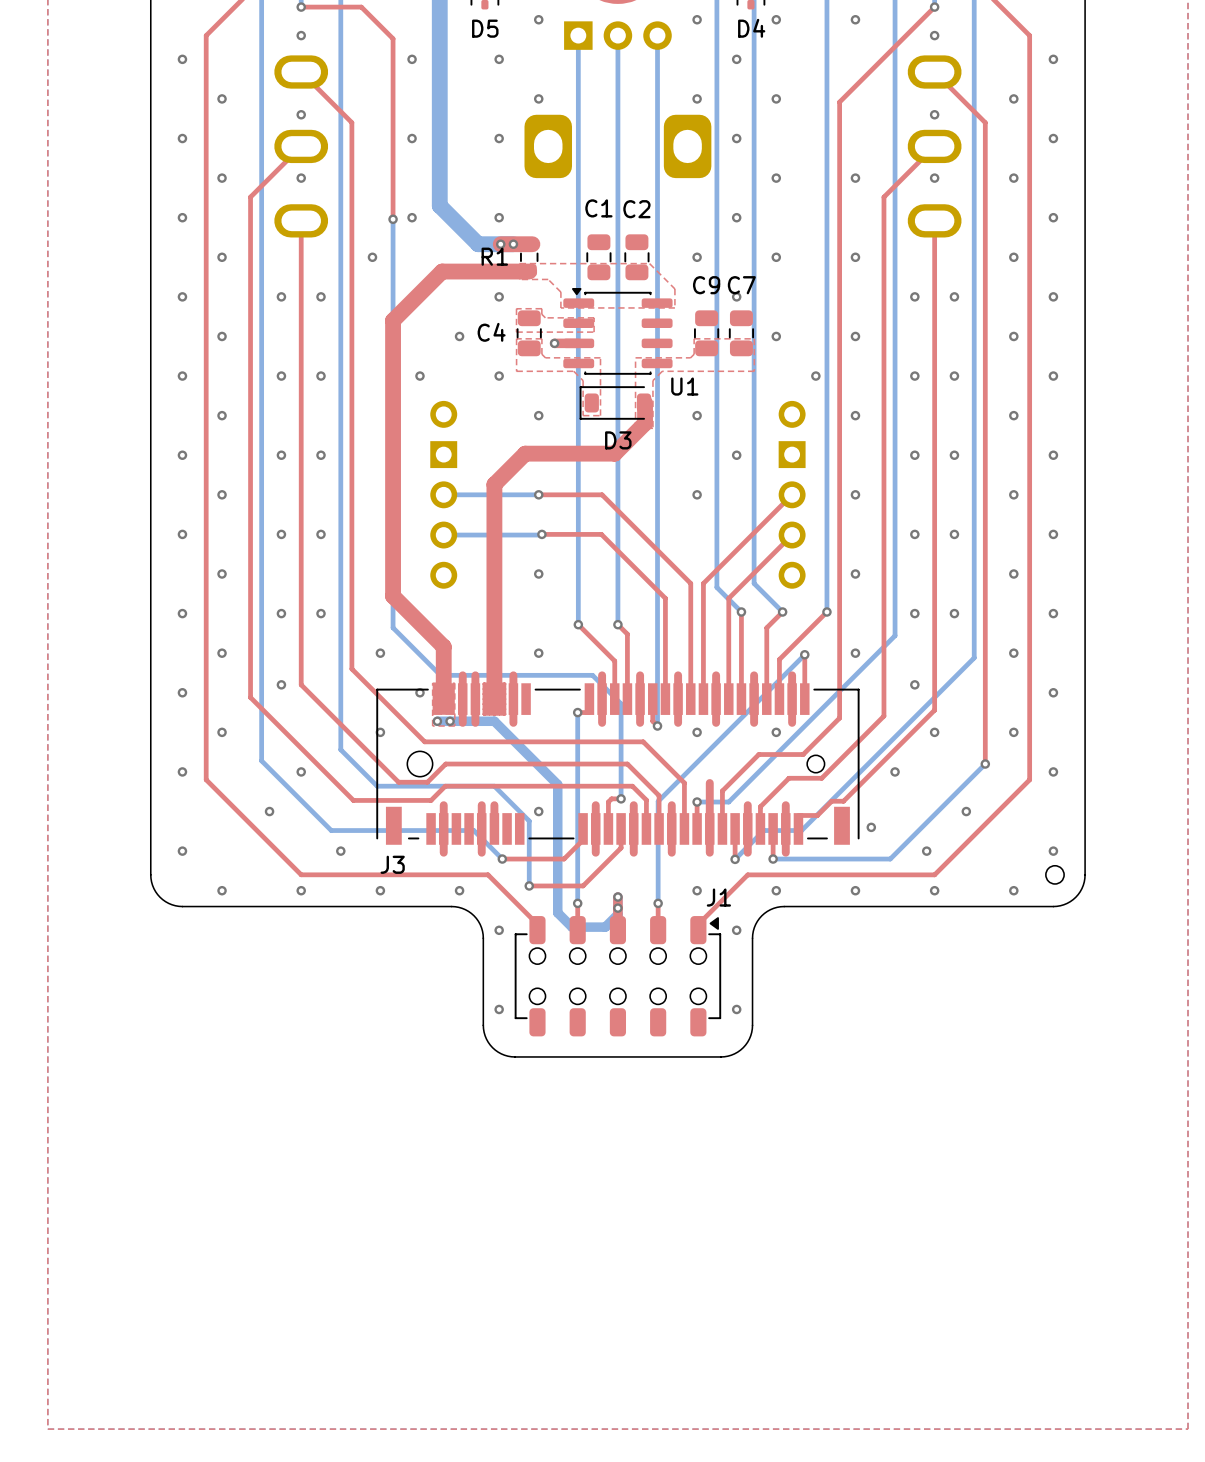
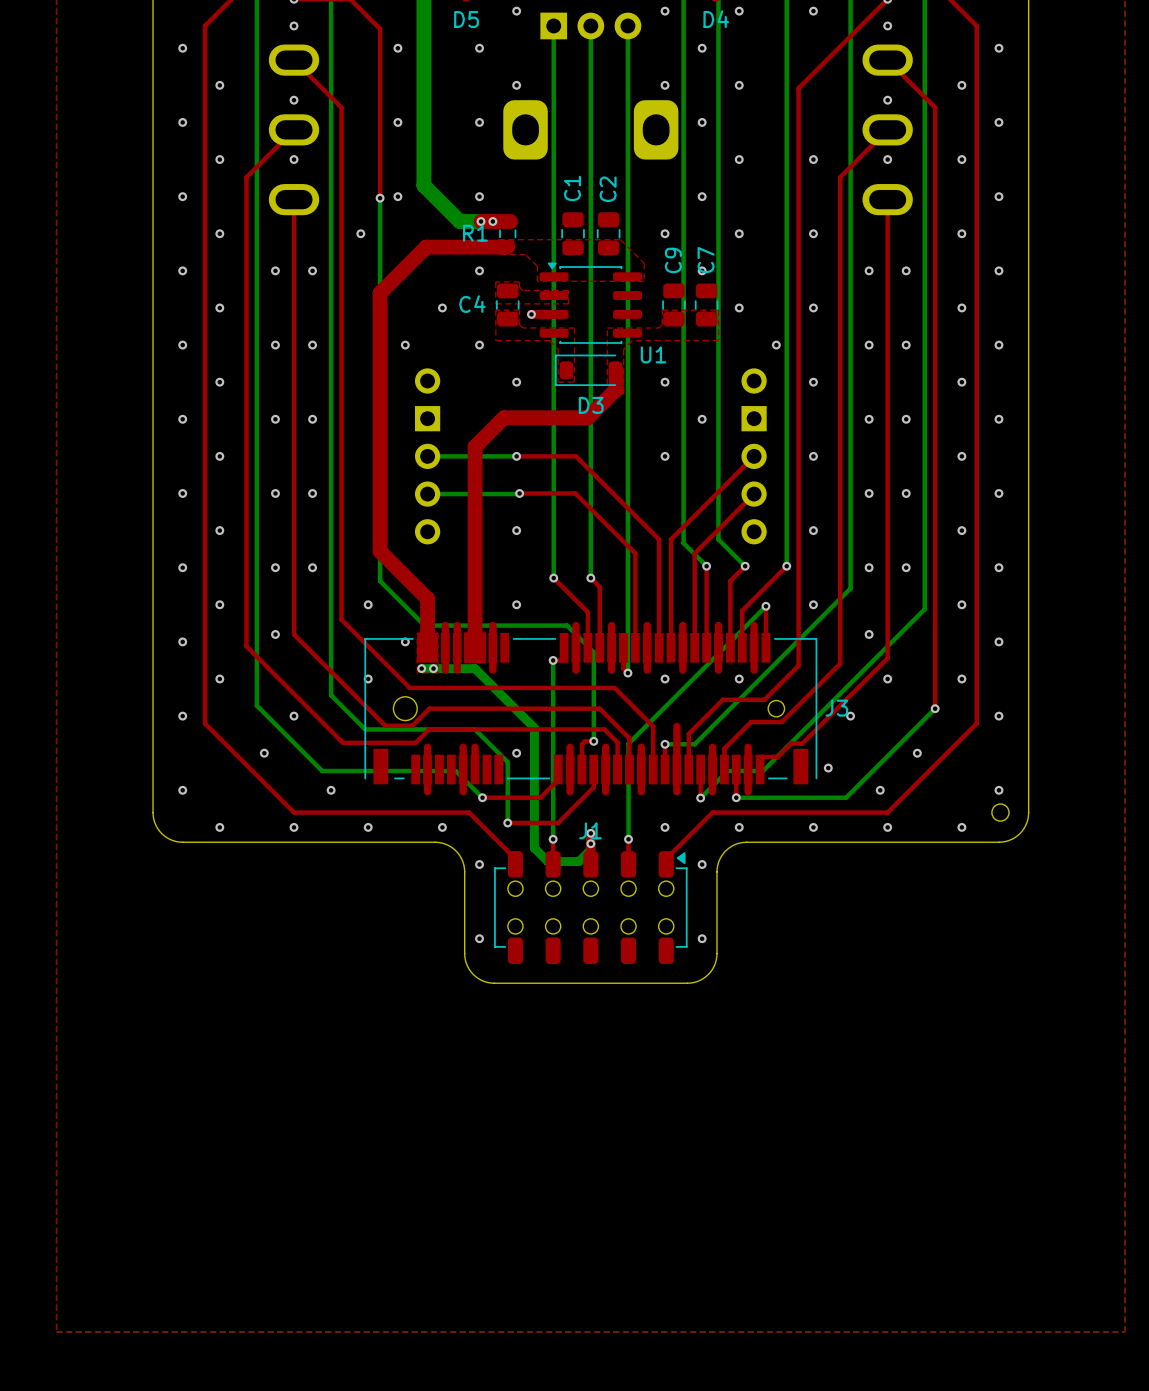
C1 name rotation: 0° (598, 208) -> 90° counterclockwise (572, 188)
C2 name rotation: 0° (636, 209) -> 90° counterclockwise (608, 189)
C9 name rotation: 0° (706, 285) -> 90° counterclockwise (673, 260)
C7 name rotation: 0° (741, 285) -> 90° counterclockwise (706, 260)
J3 name position: J3 (392, 864) -> J3 (836, 708)
J1 name position: J1 (718, 897) -> J1 (590, 830)

